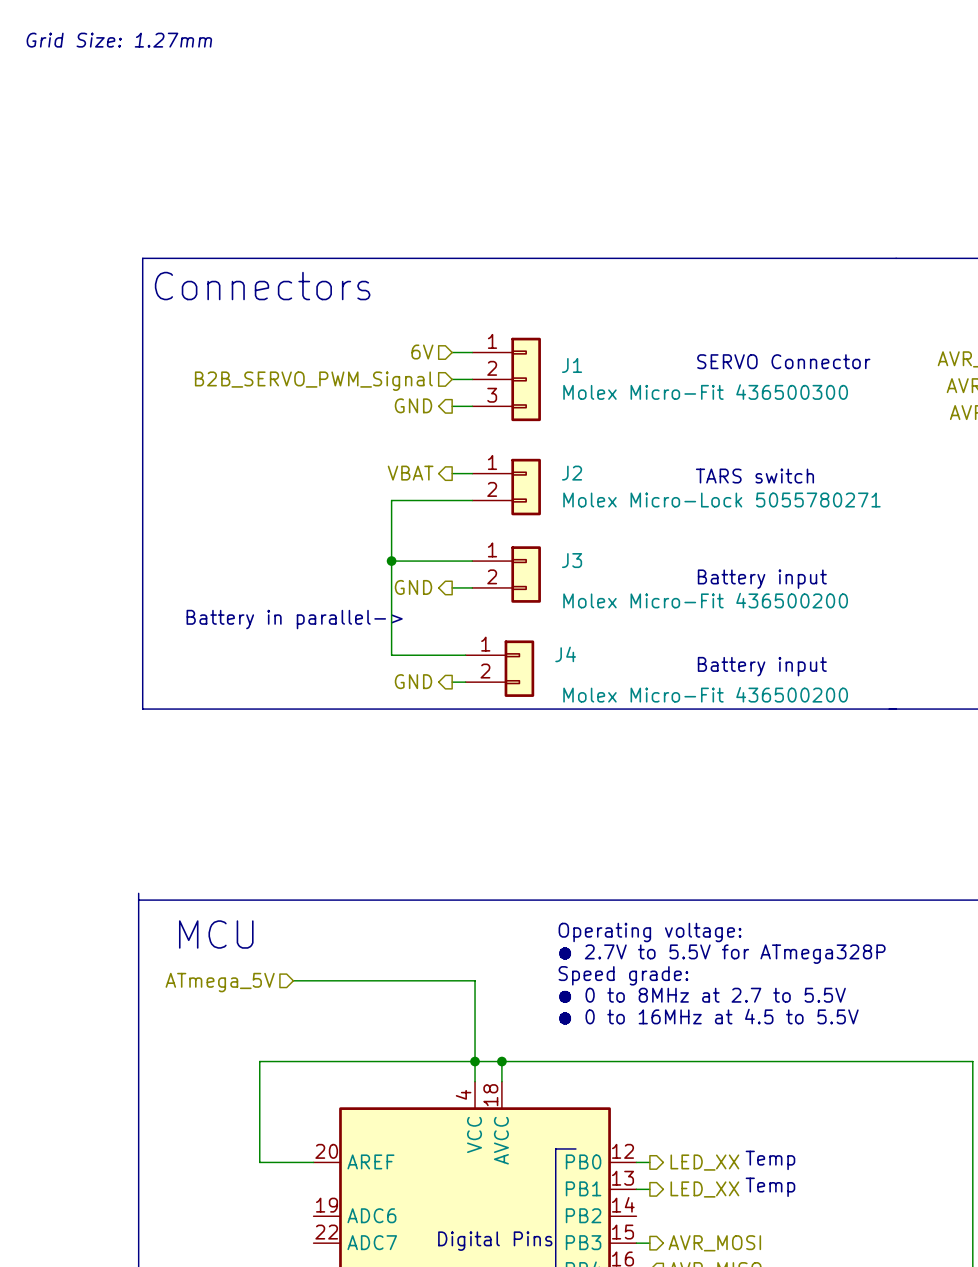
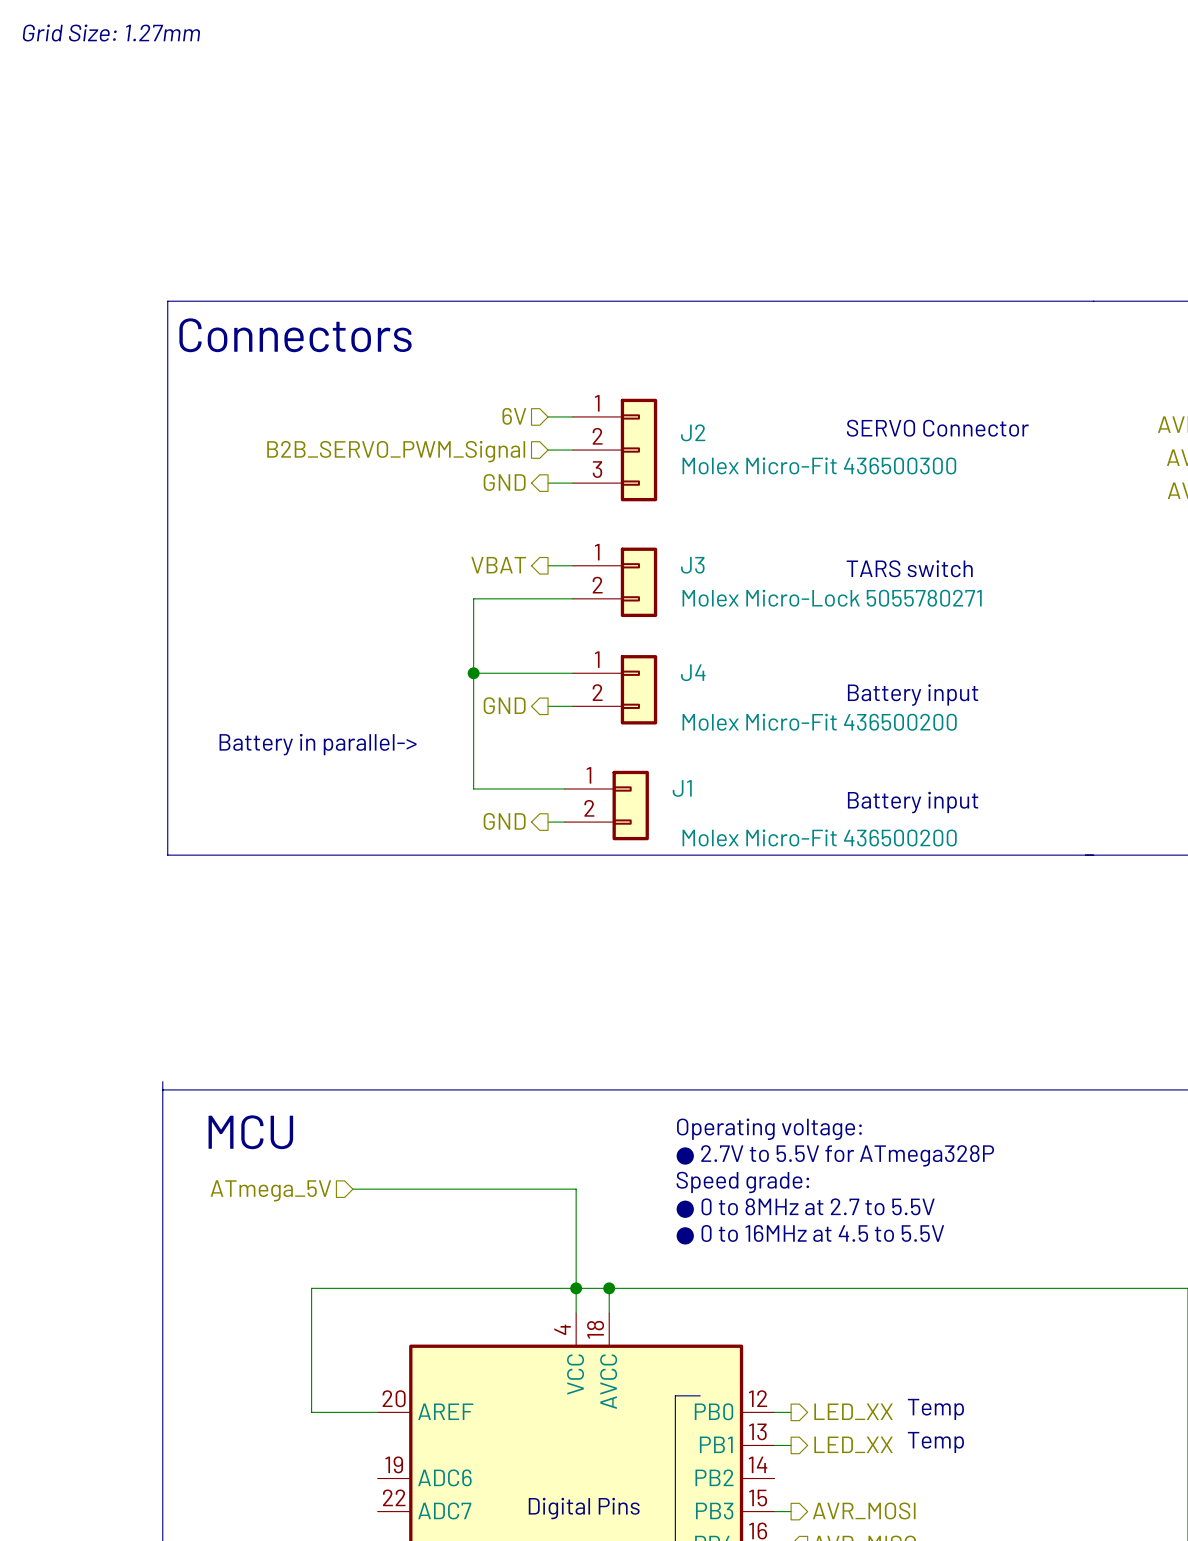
J1 name: J1 (572, 365) -> J2 (693, 432)
J2 name: J2 (572, 473) -> J3 (692, 565)
J3 name: J3 (572, 560) -> J4 (693, 672)
J4 name: J4 (565, 654) -> J1 (682, 788)

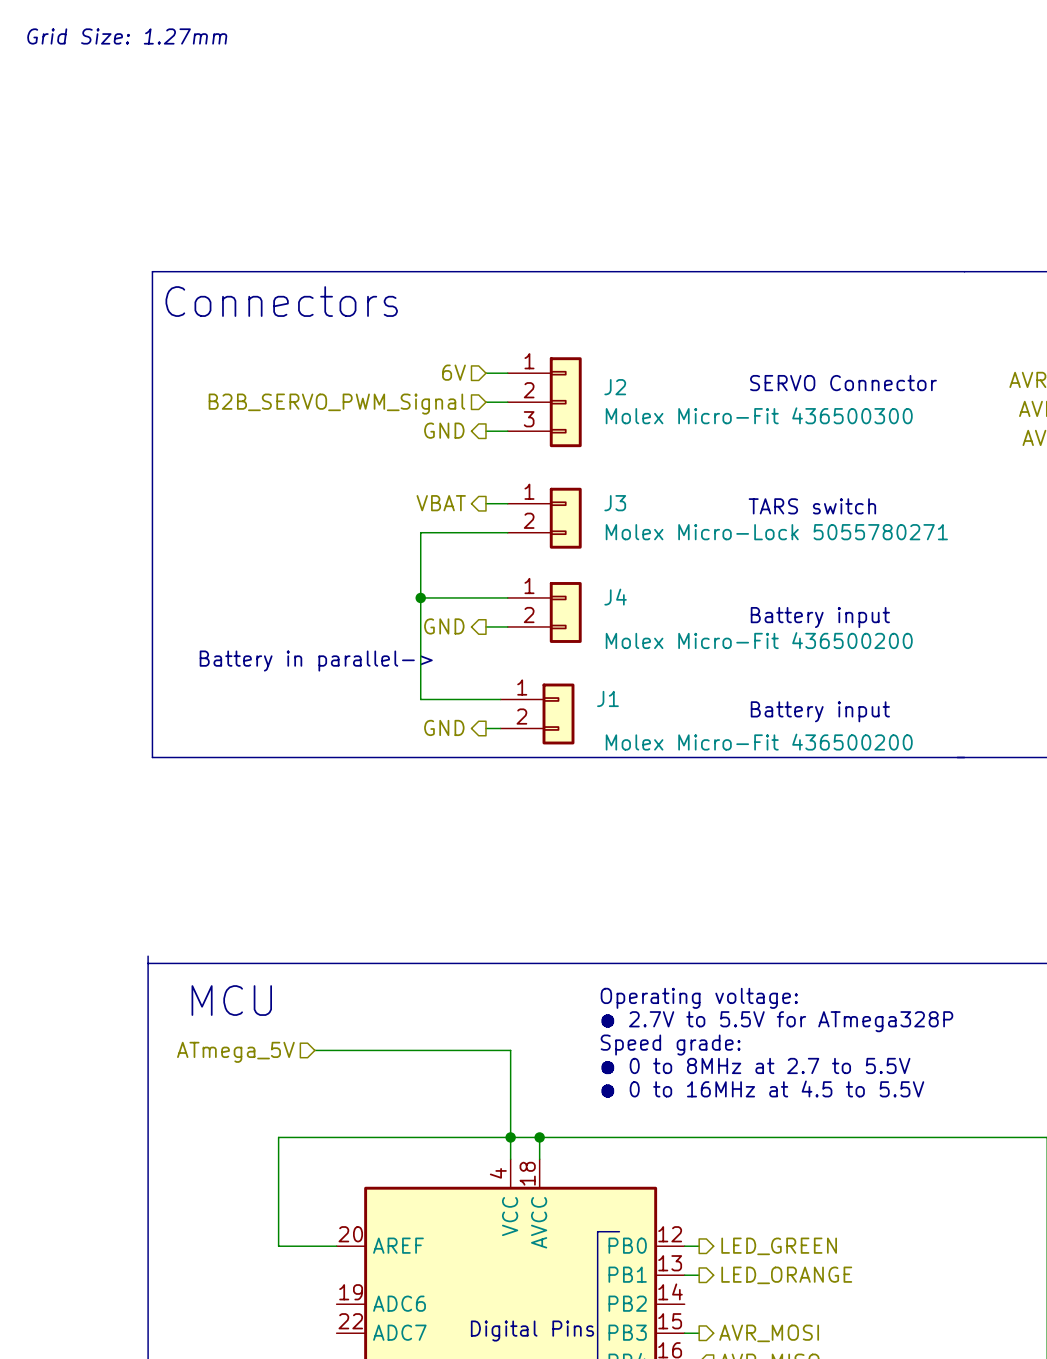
text: Temp (935, 1409) -> none
hierarchical label: LED_XX (853, 1411) -> LED_GREEN (779, 1246)
text: Temp (935, 1442) -> none
hierarchical label: LED_XX (853, 1444) -> LED_ORANGE (786, 1275)

